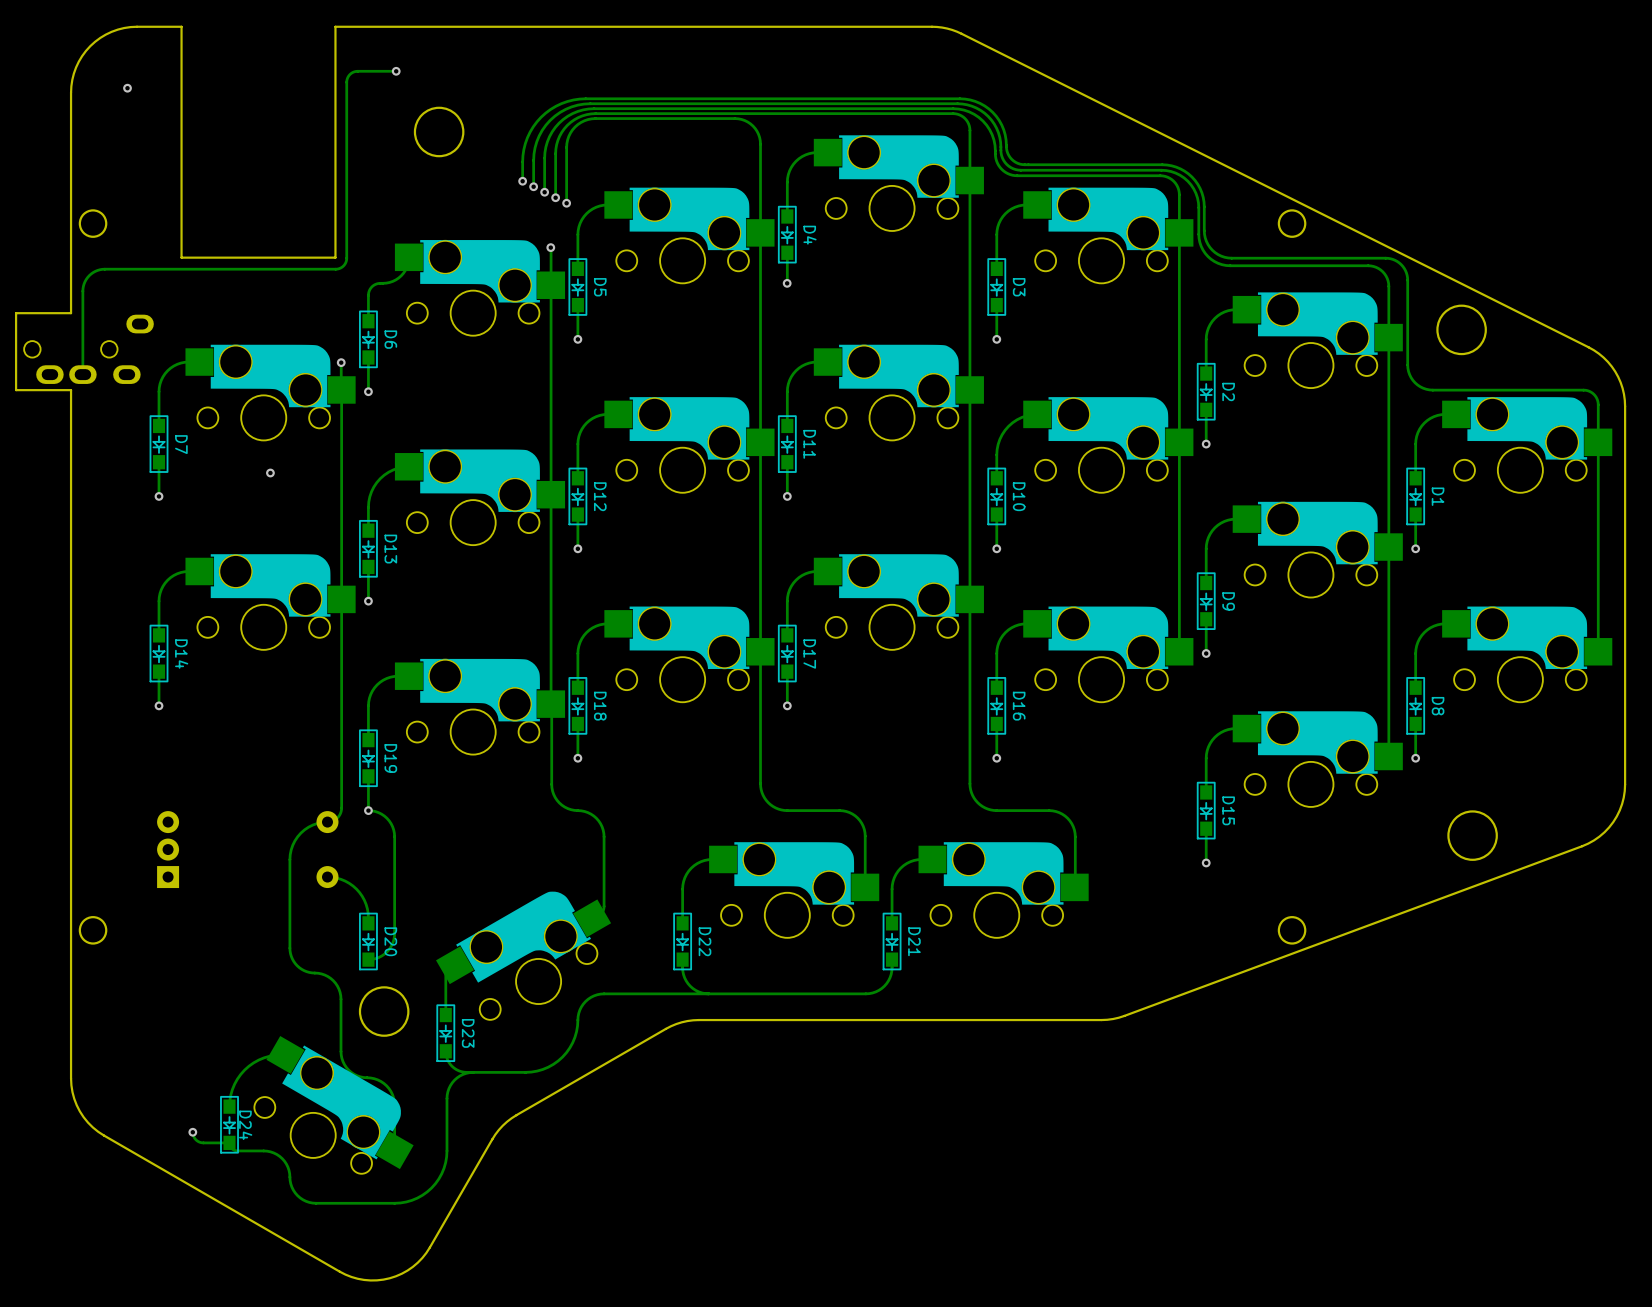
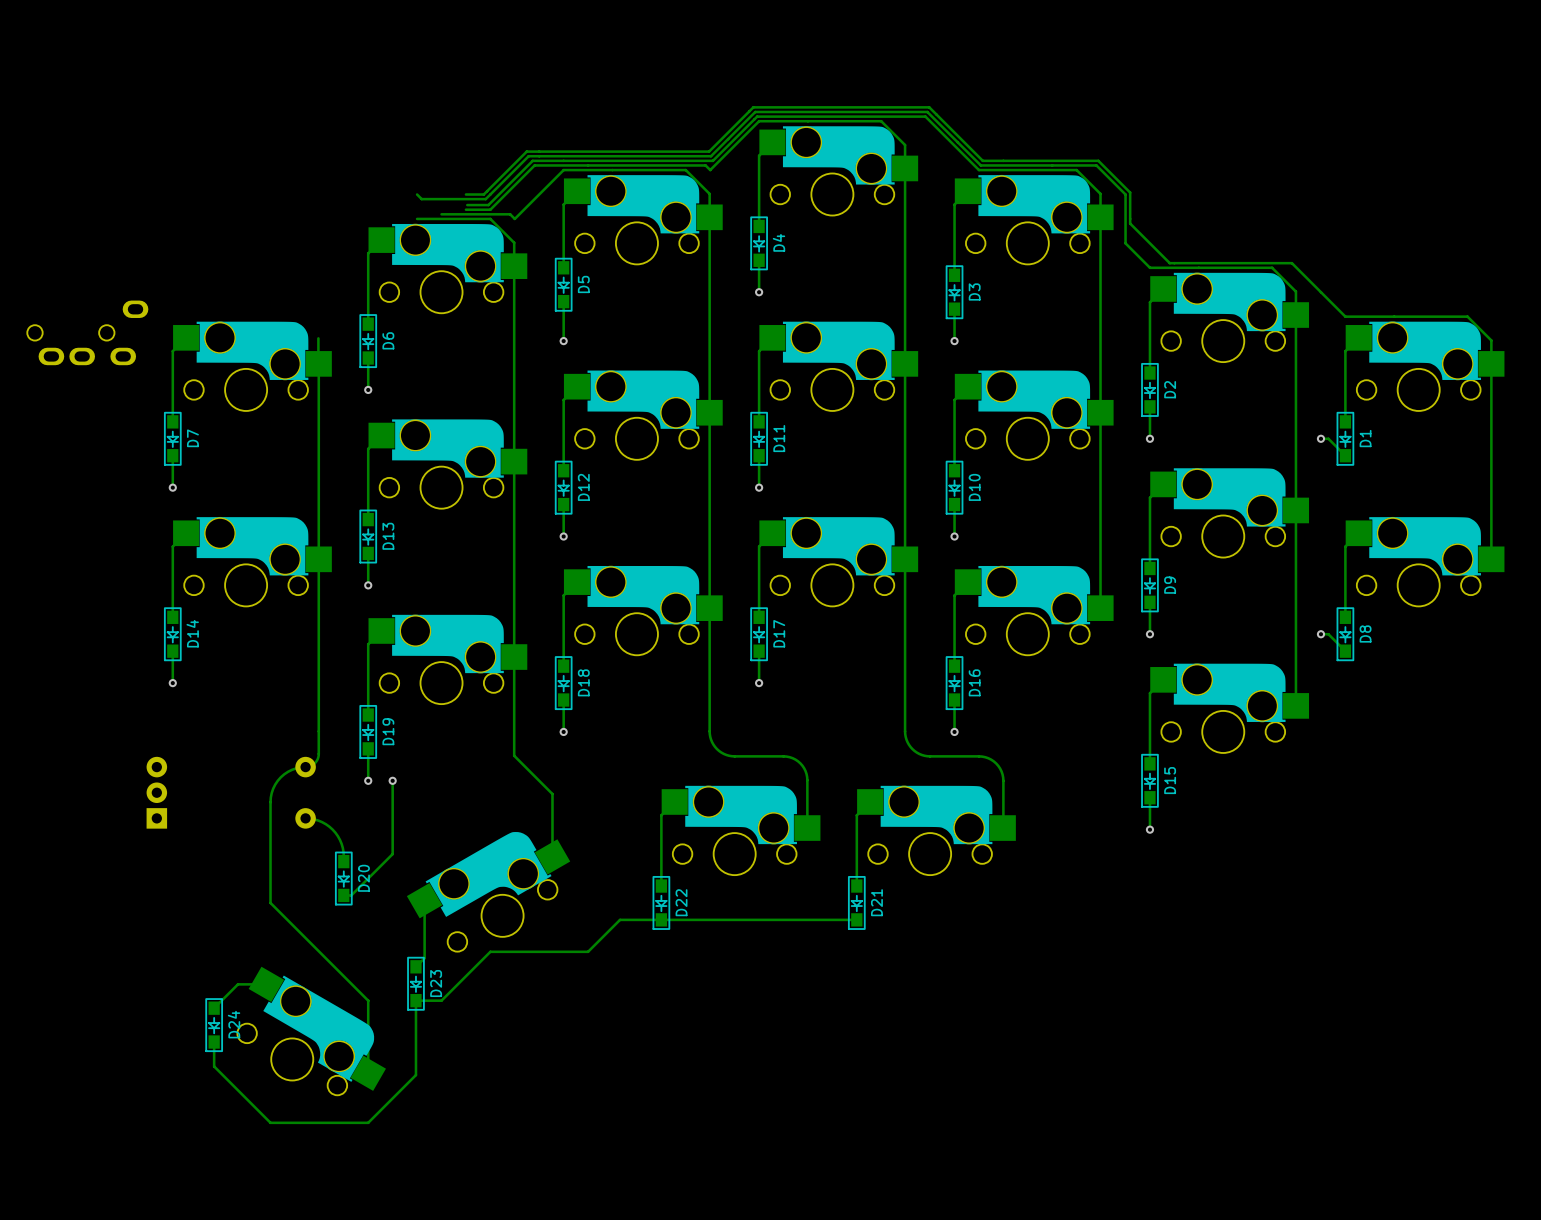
board edge: (932, 26) (335, 26) (335, 257) (181, 257) (181, 26) (137, 26) (117, 29) (100, 37) (86, 50) (76, 67) (71, 86) (71, 313) (16, 313) (16, 390) (71, 390) (71, 1078) (72, 1092) (79, 1111) (98, 1131) (339, 1271) (357, 1278) (383, 1279) (407, 1270) (426, 1252) (492, 1139) (507, 1121) (676, 1024) (698, 1020) (1113, 1019) (1582, 846) (1599, 836) (1613, 822) (1622, 804) (1625, 784) (1625, 406) (1620, 382) (1607, 361) (1588, 347) (961, 33) (947, 28) (932, 26) -> none
track: (396, 71) (355, 71) (349, 74) (347, 79) (346, 258) (343, 265) (335, 269) (97, 270) (87, 277) (83, 288) (82, 368) -> none
via: (396, 71) -> none
via: (127, 88) -> none
round board edge: [413, 106, 465, 158] -> none
track: (817, 152) (802, 156) (796, 161) (789, 170) (787, 182) (787, 216) -> none
track: none -> (772, 142) (759, 155) (759, 226)
track: (969, 155) (968, 124) (963, 117) (955, 113) (591, 113) (582, 115) (570, 122) (559, 136) (555, 149) (555, 197) -> (905, 145) (881, 121) (759, 121) (710, 170) (705, 165) (534, 165) (490, 209) (465, 209)
track: (522, 181) (523, 149) (533, 126) (550, 109) (573, 99) (970, 99) (984, 105) (996, 116) (1003, 129) (1008, 155) (1020, 164) (1162, 164) (1171, 165) (1184, 171) (1195, 180) (1201, 192) (1206, 241) (1212, 250) (1221, 256) (1231, 258) (1385, 258) (1397, 261) (1404, 268) (1407, 277) (1408, 371) (1415, 382) (1423, 388) (1432, 390) (1585, 390) (1595, 395) (1598, 404) -> (465, 194) (483, 194) (526, 151) (709, 151) (753, 107) (929, 107) (982, 160) (1098, 160) (1130, 192) (1130, 223) (1169, 263) (1291, 263) (1345, 316) (1467, 316) (1491, 340) (1491, 377)
via: (522, 181) -> none
track: (533, 186) (533, 154) (539, 135) (554, 116) (577, 105) (962, 104) (980, 110) (991, 120) (998, 132) (1002, 157) (1006, 164) (1013, 168) (1161, 170) (1175, 173) (1187, 181) (1195, 193) (1198, 202) (1199, 242) (1205, 253) (1214, 261) (1230, 265) (1373, 266) (1382, 271) (1388, 281) (1388, 312) -> (417, 194) (421, 199) (485, 199) (528, 156) (711, 156) (755, 111) (927, 111) (980, 165) (1096, 165) (1125, 194) (1125, 243) (1149, 267) (1272, 267) (1295, 291)
via: (533, 186) -> none
track: (544, 192) (544, 152) (549, 136) (563, 119) (583, 109) (953, 108) (969, 111) (986, 125) (993, 140) (997, 163) (1007, 173) (1017, 175) (1165, 176) (1171, 179) (1177, 187) (1179, 207) -> (467, 205) (488, 205) (532, 160) (712, 160) (757, 116) (925, 116) (978, 170) (1076, 170) (1100, 193)
via: (544, 192) -> none
via: (555, 197) -> none
track: (566, 203) (566, 143) (572, 129) (581, 122) (595, 118) (734, 118) (750, 123) (759, 137) (760, 207) -> (441, 214) (510, 214) (514, 218) (563, 170) (685, 170) (709, 193)
via: (566, 203) -> none
track: (607, 204) (596, 207) (589, 211) (580, 223) (577, 234) (577, 268) -> none
track: none -> (577, 191) (563, 204) (563, 267)
track: (1026, 204) (1015, 207) (1008, 211) (999, 223) (996, 234) (996, 268) -> none
track: none -> (967, 191) (954, 204) (954, 275)
round board edge: [78, 209, 108, 238] -> none
round board edge: [1277, 209, 1307, 238] -> none
D4 position: (787, 234) -> (759, 243)
D4 name rotation: 0° (809, 235) -> 180° (778, 242)
track: (550, 247) (551, 260) -> (417, 218) (490, 218) (514, 242)
via: (550, 247) -> none
track: (787, 252) (787, 283) -> none
track: (408, 257) (406, 267) (398, 277) (389, 282) (376, 284) (370, 288) (368, 321) -> (381, 240) (368, 253) (368, 324)
via position: (787, 283) -> (759, 292)
D5 position: (577, 286) -> (563, 284)
D3 position: (996, 286) -> (954, 292)
D5 name rotation: 0° (600, 287) -> 180° (583, 284)
D3 name rotation: 0° (1019, 287) -> 180° (974, 291)
round board edge: [1436, 304, 1487, 356] -> none
track: (577, 305) (577, 339) -> (759, 260) (759, 292)
track: (996, 305) (996, 339) -> (954, 309) (954, 341)
track: (1235, 309) (1224, 311) (1217, 315) (1208, 328) (1206, 339) (1206, 373) -> none
track: none -> (1163, 288) (1149, 302) (1149, 373)
part footprint: [24, 314, 154, 384] -> [27, 300, 149, 366]
track: none -> (563, 301) (563, 341)
D6 position: (368, 339) -> (368, 341)
D6 name rotation: 0° (390, 339) -> 180° (388, 340)
via position: (577, 339) -> (563, 341)
via position: (996, 339) -> (954, 341)
track: (368, 357) (368, 391) -> (368, 358) (368, 389)
track: (188, 362) (173, 366) (165, 373) (161, 380) (159, 391) (159, 425) -> none
track: none -> (186, 337) (172, 351) (172, 421)
via: (341, 362) -> none
track: (817, 362) (802, 366) (796, 370) (789, 380) (787, 391) (787, 425) -> none
track: none -> (772, 337) (759, 351) (759, 421)
track: none -> (1358, 337) (1345, 351) (1345, 421)
via position: (368, 391) -> (368, 389)
D2 position: (1206, 391) -> (1149, 389)
D2 name rotation: 0° (1228, 391) -> 180° (1170, 389)
track: (1206, 409) (1206, 444) -> (1149, 406) (1149, 438)
track: (607, 414) (596, 416) (589, 420) (580, 432) (577, 444) (577, 478) -> none
track: none -> (577, 386) (563, 400) (563, 470)
track: (1037, 414) (1017, 419) (1002, 434) (997, 449) (996, 478) -> (967, 386) (954, 400) (954, 470)
track: (1445, 414) (1433, 416) (1427, 420) (1417, 432) (1415, 444) (1415, 478) -> none
D7 position: (159, 444) -> (172, 438)
D7 name rotation: 0° (181, 444) -> 180° (192, 438)
D11 position: (787, 444) -> (759, 438)
D11 name rotation: 0° (809, 444) -> 180° (779, 438)
via position: (1206, 444) -> (1149, 438)
part position: (1527, 444) -> (1425, 366)
track: (159, 462) (159, 496) -> (172, 455) (172, 487)
track: (787, 462) (787, 496) -> (759, 455) (759, 487)
track: (408, 466) (388, 472) (373, 487) (368, 501) (368, 530) -> (381, 435) (368, 448) (368, 519)
track: none -> (1320, 438) (1328, 438) (1345, 455)
via: none -> (1320, 438)
via: (270, 473) -> none
via position: (159, 496) -> (172, 487)
D12 position: (577, 496) -> (563, 487)
D12 name rotation: 0° (600, 496) -> 180° (583, 487)
via position: (787, 496) -> (759, 487)
D10 position: (996, 496) -> (954, 487)
D10 name rotation: 0° (1019, 496) -> 180° (974, 487)
D1 position: (1415, 496) -> (1345, 438)
D1 name rotation: 0° (1438, 496) -> 180° (1365, 438)
track: (577, 514) (577, 548) -> (563, 504) (563, 536)
track: (996, 514) (996, 548) -> (954, 504) (954, 536)
track: (1415, 514) (1415, 548) -> none
track: (1235, 519) (1221, 523) (1212, 530) (1208, 537) (1206, 548) (1206, 583) -> none
track: none -> (1163, 484) (1149, 497) (1149, 568)
D13 position: (368, 548) -> (368, 536)
via position: (577, 548) -> (563, 536)
via position: (996, 548) -> (954, 536)
via: (1415, 548) -> none
D13 name rotation: 0° (390, 549) -> 180° (388, 536)
track: (368, 566) (368, 601) -> (368, 553) (368, 585)
track: (188, 571) (173, 575) (167, 580) (161, 589) (159, 601) (159, 635) -> none
track: none -> (186, 533) (172, 546) (172, 617)
track: (817, 571) (802, 575) (793, 583) (789, 589) (787, 601) (787, 635) -> none
track: none -> (772, 533) (759, 546) (759, 617)
track: none -> (1358, 533) (1345, 546) (1345, 617)
track: (1598, 599) (1598, 651) -> none
via position: (368, 601) -> (368, 585)
D9 position: (1206, 601) -> (1149, 585)
D9 name rotation: 0° (1228, 601) -> 180° (1170, 585)
track: (1206, 619) (1206, 653) -> (1149, 602) (1149, 634)
track: (607, 623) (596, 626) (589, 629) (580, 642) (577, 653) (577, 687) -> none
track: none -> (577, 582) (563, 595) (563, 666)
track: (1026, 623) (1015, 626) (1008, 629) (999, 642) (996, 653) (996, 687) -> none
track: none -> (967, 582) (954, 595) (954, 666)
track: (1445, 623) (1430, 627) (1421, 635) (1417, 642) (1415, 653) (1415, 687) -> none
D14 position: (159, 653) -> (172, 634)
D17 position: (787, 653) -> (759, 634)
via position: (1206, 653) -> (1149, 634)
D14 name rotation: 0° (181, 654) -> 180° (192, 633)
D17 name rotation: 0° (809, 654) -> 180° (779, 633)
part position: (1527, 654) -> (1425, 561)
track: (159, 671) (159, 705) -> (172, 651) (172, 683)
track: (787, 671) (787, 705) -> (759, 651) (759, 683)
track: (398, 676) (386, 678) (380, 682) (370, 694) (368, 705) (368, 740) -> none
track: none -> (381, 630) (368, 644) (368, 715)
track: none -> (1320, 634) (1328, 634) (1345, 651)
via: none -> (1320, 634)
via position: (159, 705) -> (172, 683)
track: (551, 705) (551, 784) (553, 794) (564, 807) (584, 811) (593, 816) (600, 823) (603, 833) (603, 907) (599, 915) (592, 918) -> (514, 657) (514, 755) (552, 794) (552, 856)
D18 position: (577, 705) -> (563, 683)
via position: (787, 705) -> (759, 683)
D16 position: (996, 705) -> (954, 683)
D8 position: (1415, 705) -> (1345, 634)
D18 name rotation: 0° (600, 706) -> 180° (583, 682)
D16 name rotation: 0° (1019, 706) -> 180° (974, 682)
D8 name rotation: 0° (1438, 706) -> 180° (1365, 633)
track: (577, 724) (577, 758) -> (563, 700) (563, 731)
track: (996, 724) (996, 758) -> (954, 700) (954, 731)
track: (1415, 724) (1415, 758) -> none
track: (1235, 728) (1221, 732) (1214, 737) (1208, 746) (1206, 758) (1206, 792) -> none
track: none -> (1163, 679) (1149, 693) (1149, 763)
D19 position: (368, 758) -> (368, 731)
D19 name rotation: 0° (390, 758) -> 180° (388, 731)
via position: (577, 758) -> (563, 731)
via position: (996, 758) -> (954, 731)
via: (1415, 758) -> none
track: (368, 776) (368, 810) (378, 812) (386, 818) (392, 826) (394, 836) (393, 940) (384, 954) (368, 959) -> (392, 780) (392, 854) (351, 895) (343, 895)
track: none -> (368, 748) (368, 780)
via: (368, 810) -> none
D15 position: (1206, 810) -> (1149, 780)
D15 name rotation: 0° (1228, 810) -> 180° (1170, 780)
round board edge: [1447, 810, 1498, 861] -> none
track: (1206, 828) (1206, 862) -> (1149, 797) (1149, 829)
via: none -> (368, 780)
via: none -> (392, 780)
track: (712, 859) (700, 861) (694, 865) (684, 877) (682, 889) (682, 923) -> none
track: none -> (674, 801) (661, 815) (661, 886)
track: (921, 859) (910, 861) (903, 865) (894, 877) (892, 889) (892, 923) -> none
track: none -> (870, 801) (856, 815) (856, 886)
via position: (1206, 862) -> (1149, 829)
round board edge: [78, 916, 108, 945] -> none
round board edge: [1277, 916, 1307, 945] -> none
D20 name rotation: 0° (390, 941) -> 180° (363, 878)
D22 position: (682, 941) -> (661, 902)
D22 name rotation: 0° (705, 941) -> 180° (681, 902)
D21 position: (892, 941) -> (856, 902)
D21 name rotation: 0° (914, 941) -> 180° (876, 902)
track: (289, 948) (292, 958) (299, 967) (306, 971) (327, 976) (339, 989) (341, 999) (341, 1055) (344, 1064) (357, 1075) (374, 1078) (383, 1083) (392, 1094) (394, 1105) -> (270, 884) (270, 902) (368, 1000) (368, 1031)
track: (682, 959) (683, 974) (688, 983) (695, 990) (708, 993) -> none
track: (892, 959) (891, 974) (886, 983) (878, 990) (869, 993) (604, 993) (594, 995) (585, 1001) (579, 1010) (576, 1031) (569, 1047) (553, 1064) (531, 1072) (469, 1072) (454, 1080) (447, 1095) (446, 1156) (441, 1173) (435, 1183) (422, 1195) (406, 1201) (394, 1203) -> none
track: none -> (424, 900) (424, 958) (415, 966)
track: (445, 974) (445, 1015) -> none
track: none -> (856, 919) (620, 919) (588, 951) (490, 951) (441, 1000)
round board edge: [358, 986, 410, 1037] -> none
D23 position: (445, 1033) -> (415, 983)
D23 name rotation: 0° (468, 1033) -> 180° (436, 983)
track: (445, 1051) (447, 1059) (451, 1066) (458, 1070) (466, 1072) -> (368, 1122) (415, 1075) (415, 1000) (435, 1000)
track: (281, 1054) (258, 1060) (244, 1070) (234, 1084) (229, 1106) -> none
track: none -> (266, 984) (237, 984) (214, 1008)
D24 position: (229, 1124) -> (214, 1025)
D24 name rotation: 0° (245, 1125) -> 180° (234, 1024)
track: (192, 1132) (195, 1138) (201, 1142) (229, 1142) (231, 1147) (235, 1150) (267, 1151) (276, 1154) (287, 1167) (290, 1183) (295, 1193) (306, 1201) (316, 1203) -> (214, 1042) (214, 1066) (270, 1122) (294, 1122)
via: (192, 1132) -> none

